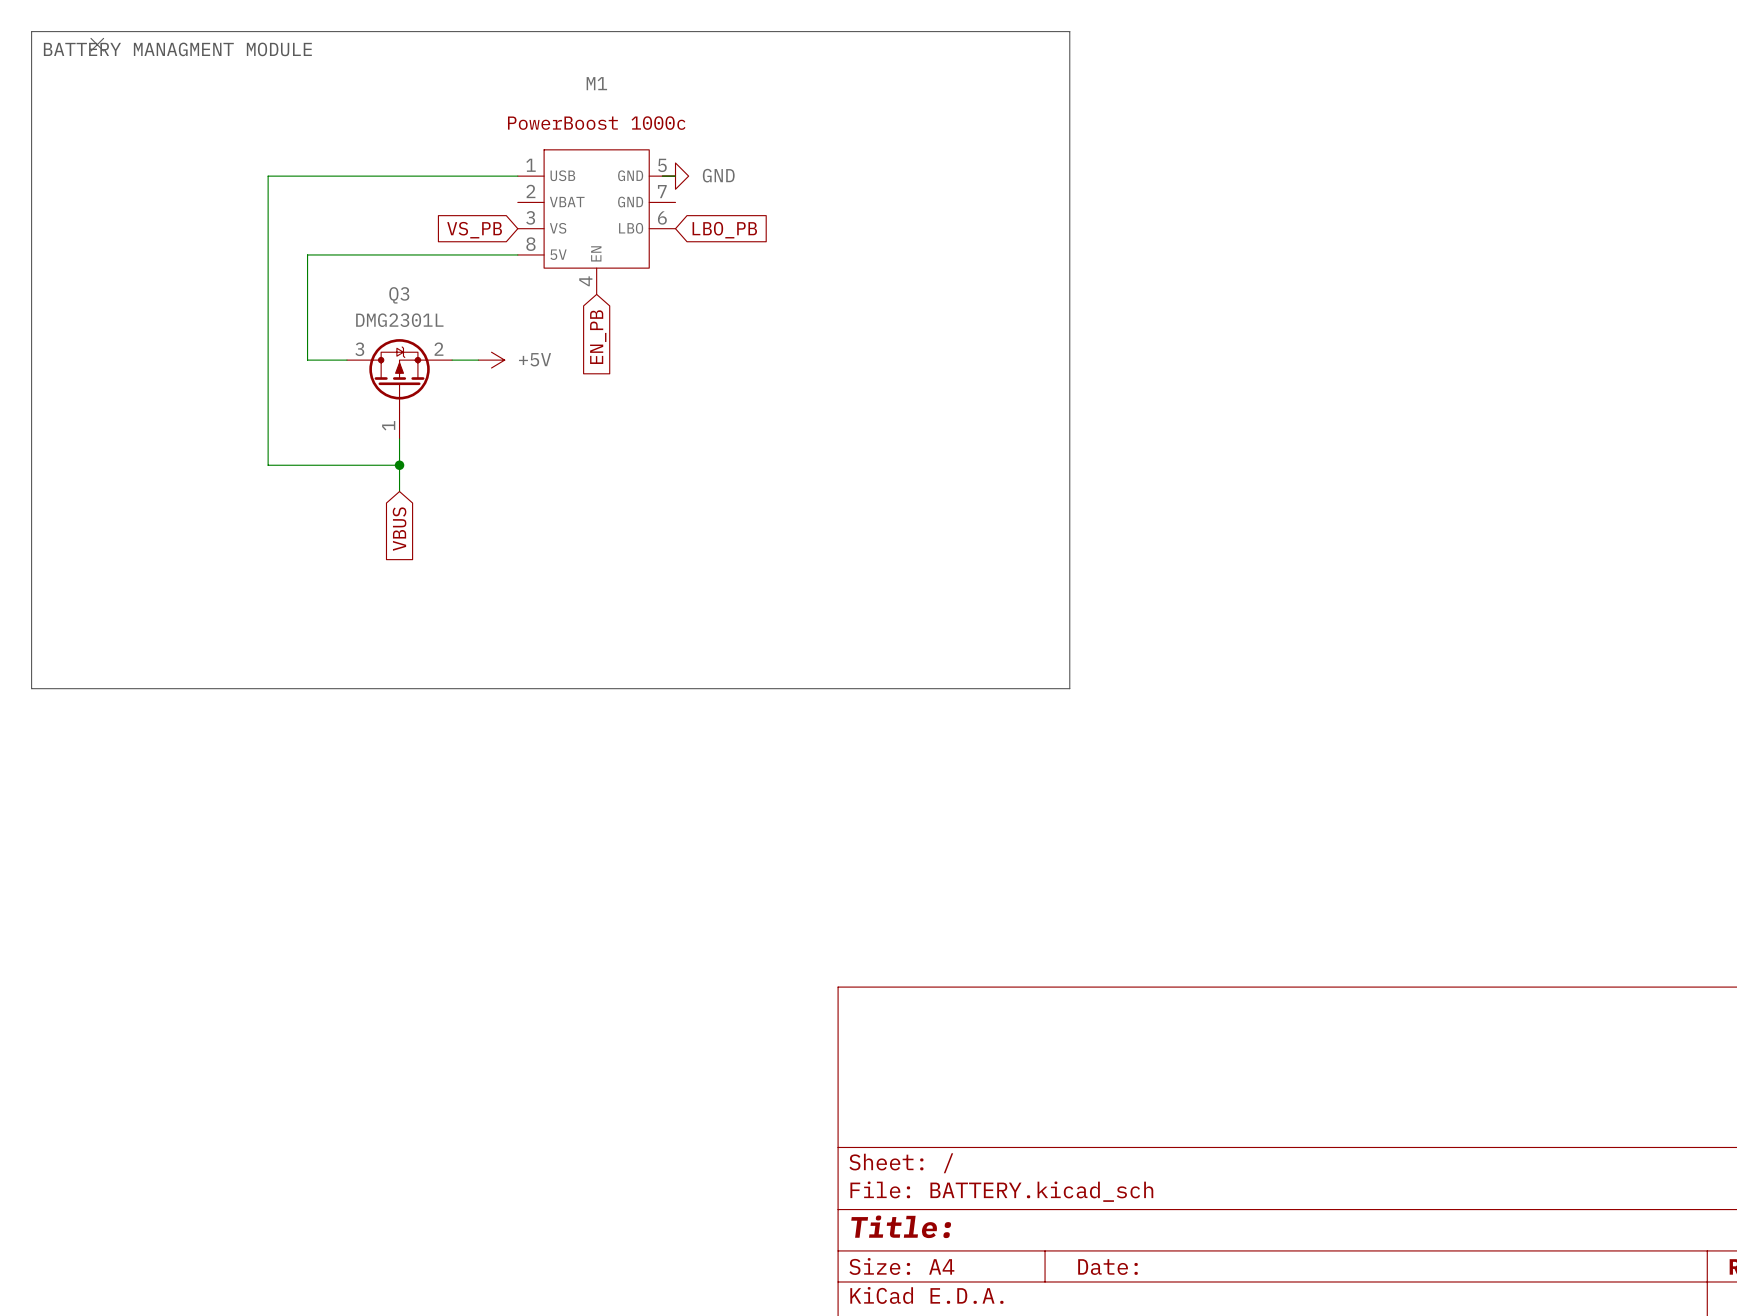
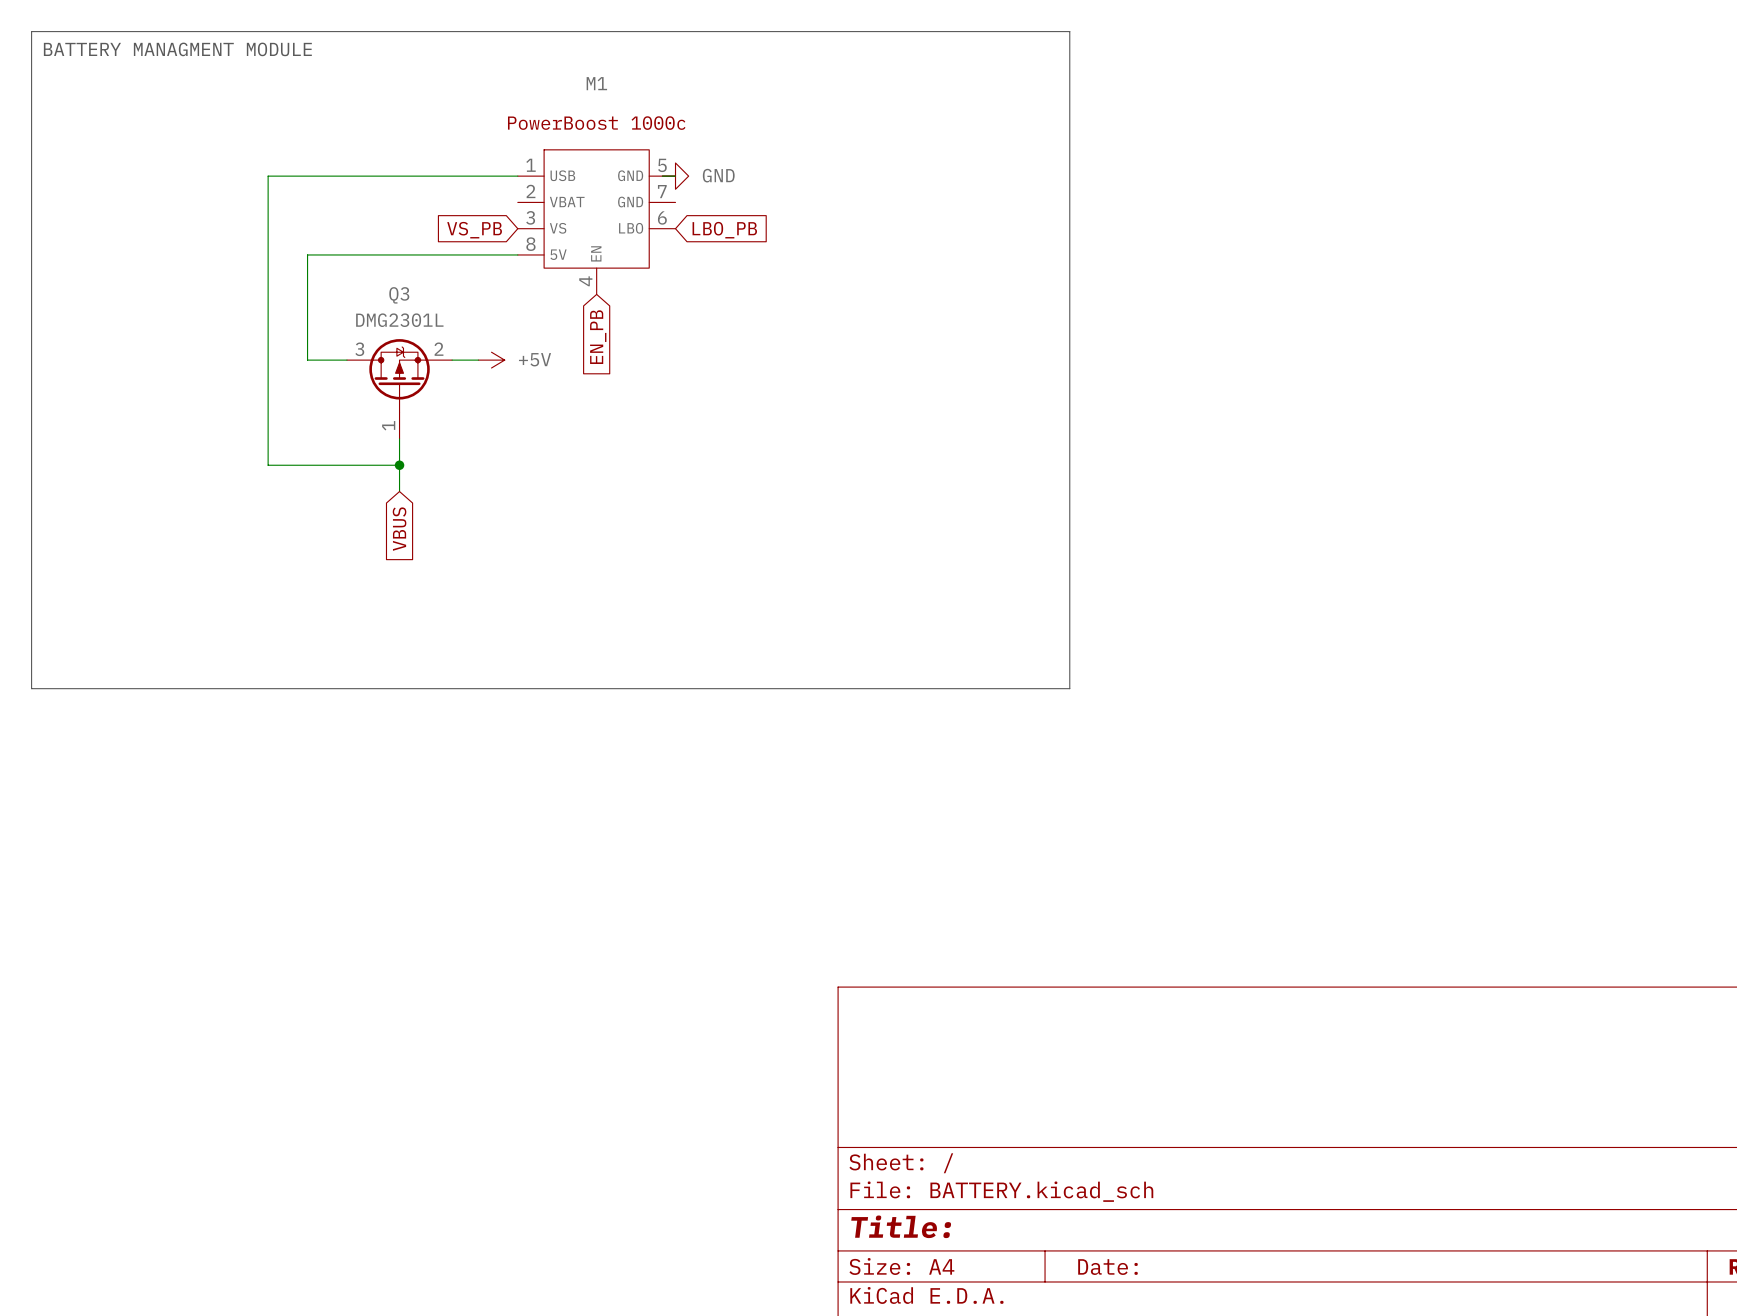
no-connect mark: (97, 44) -> none

